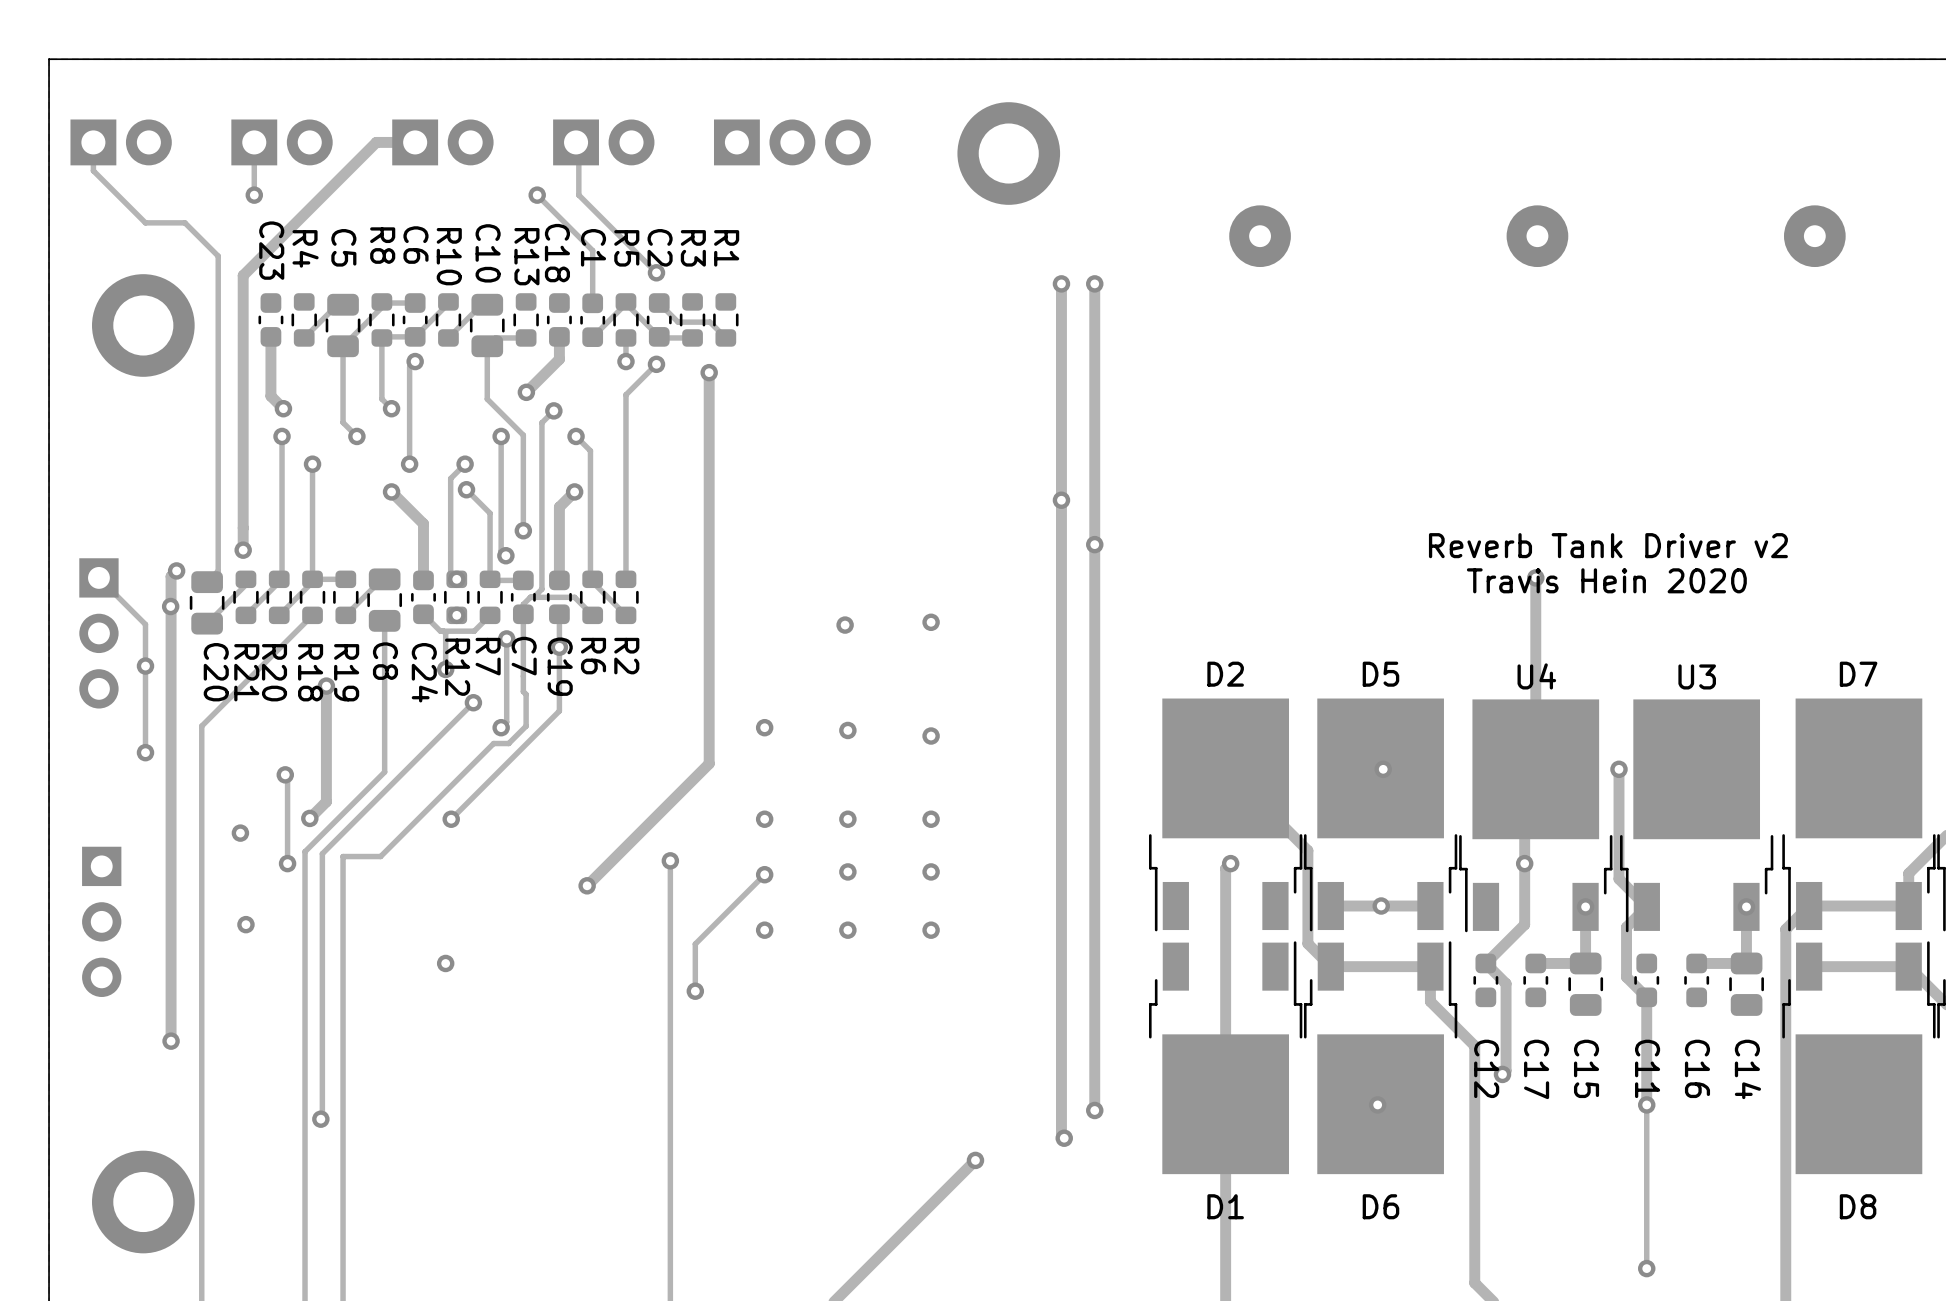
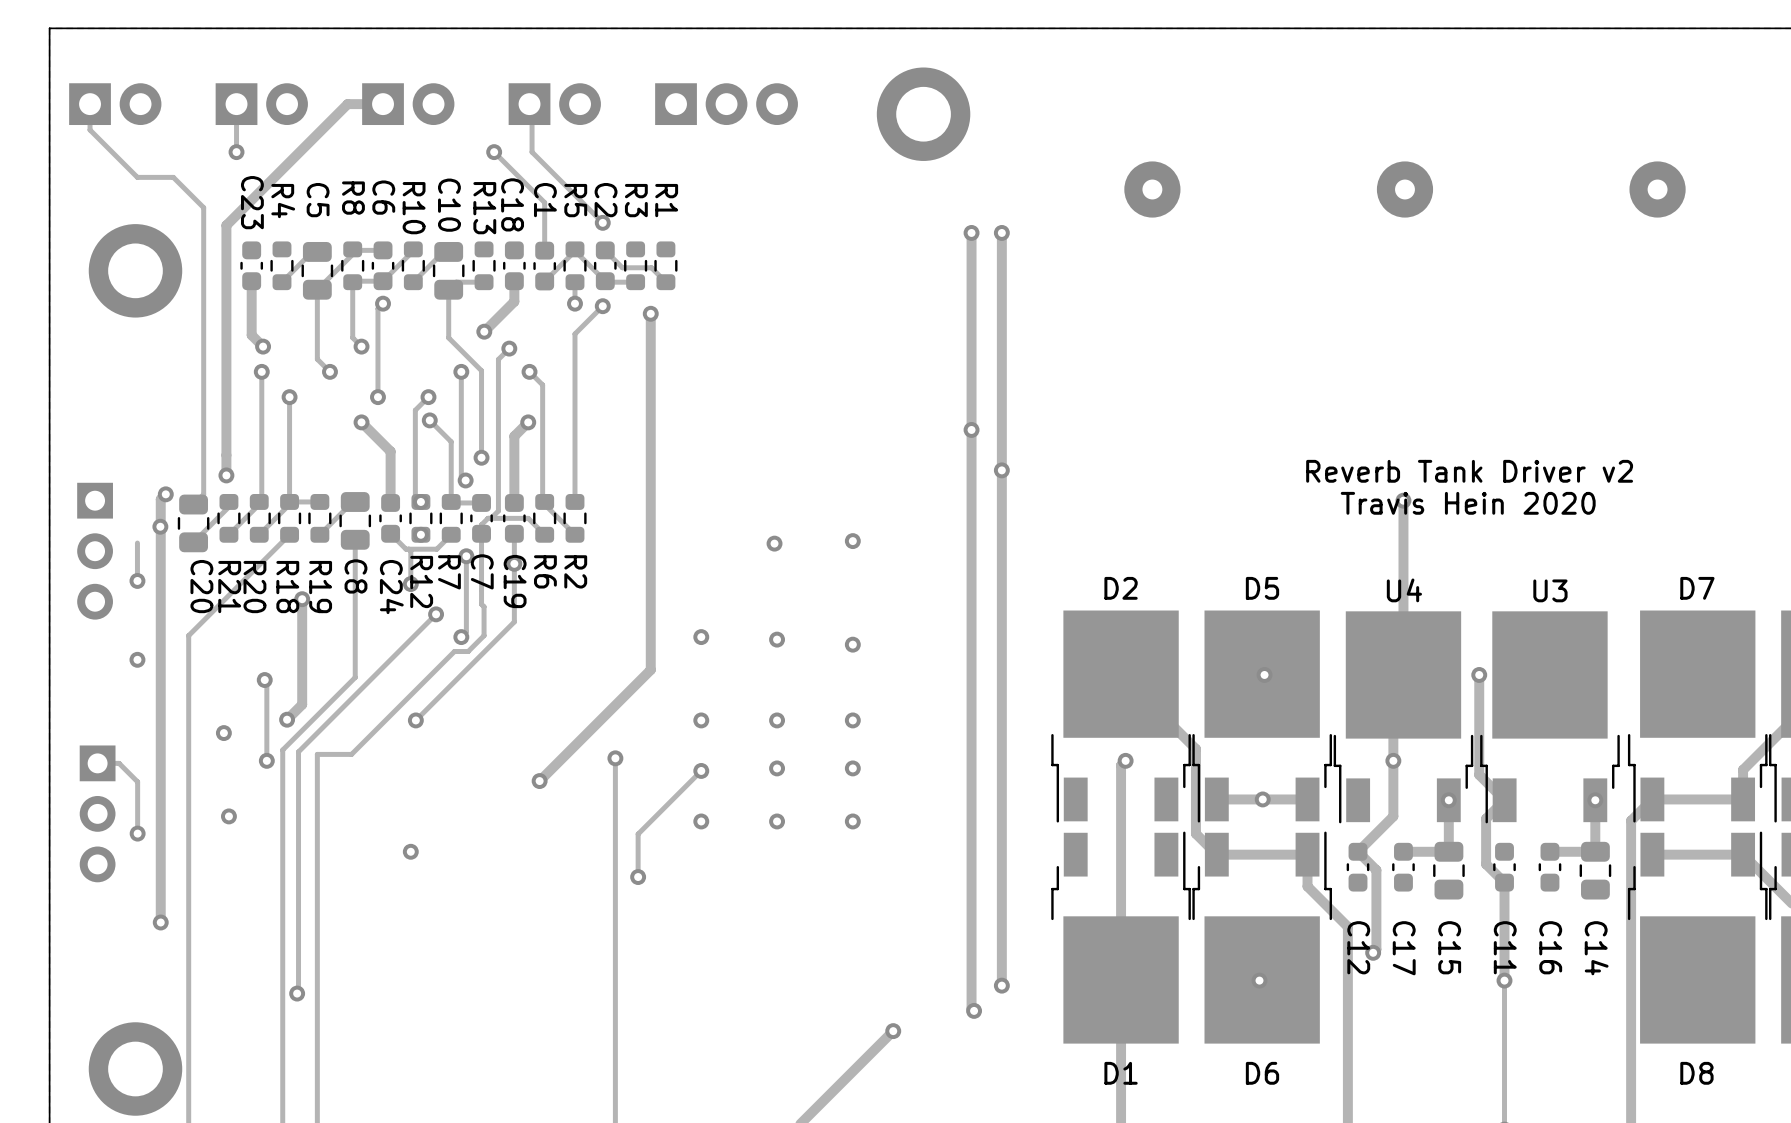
track: (98, 577) (145, 624) -> none
track: (145, 666) (145, 752) -> none
track: none -> (97, 763) (119, 763) (137, 781) (137, 833)
via: none -> (137, 833)

